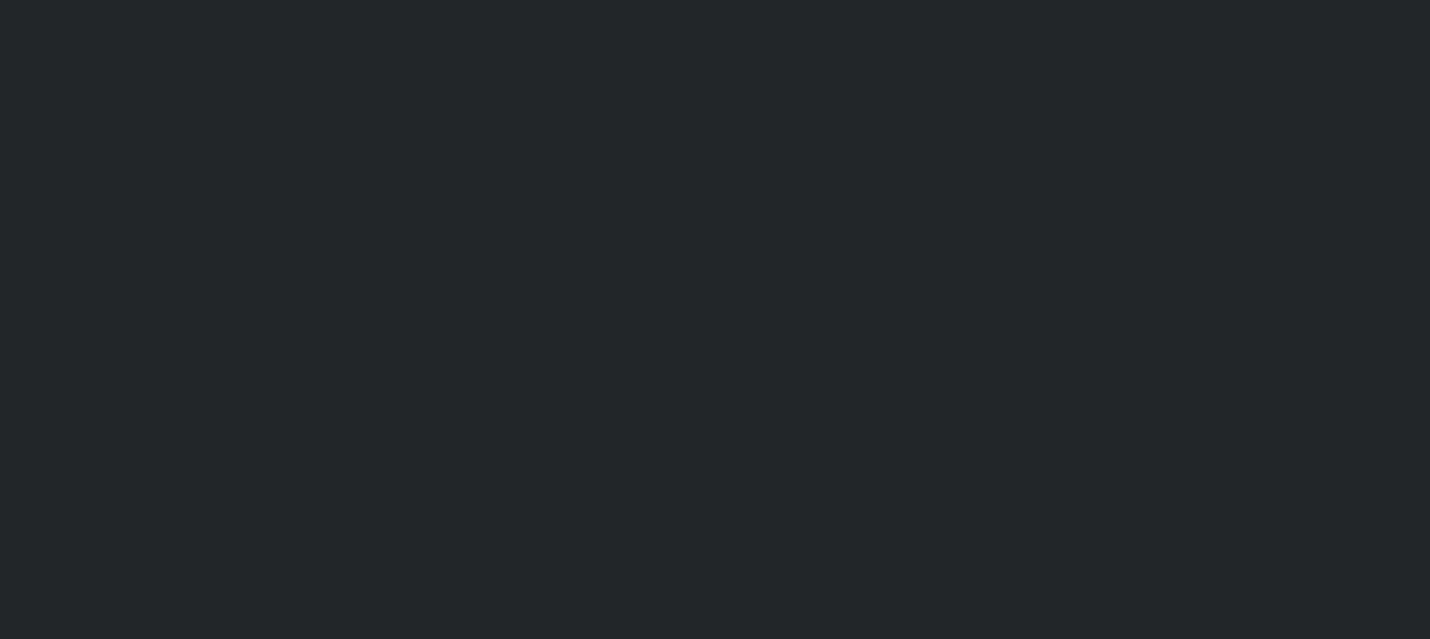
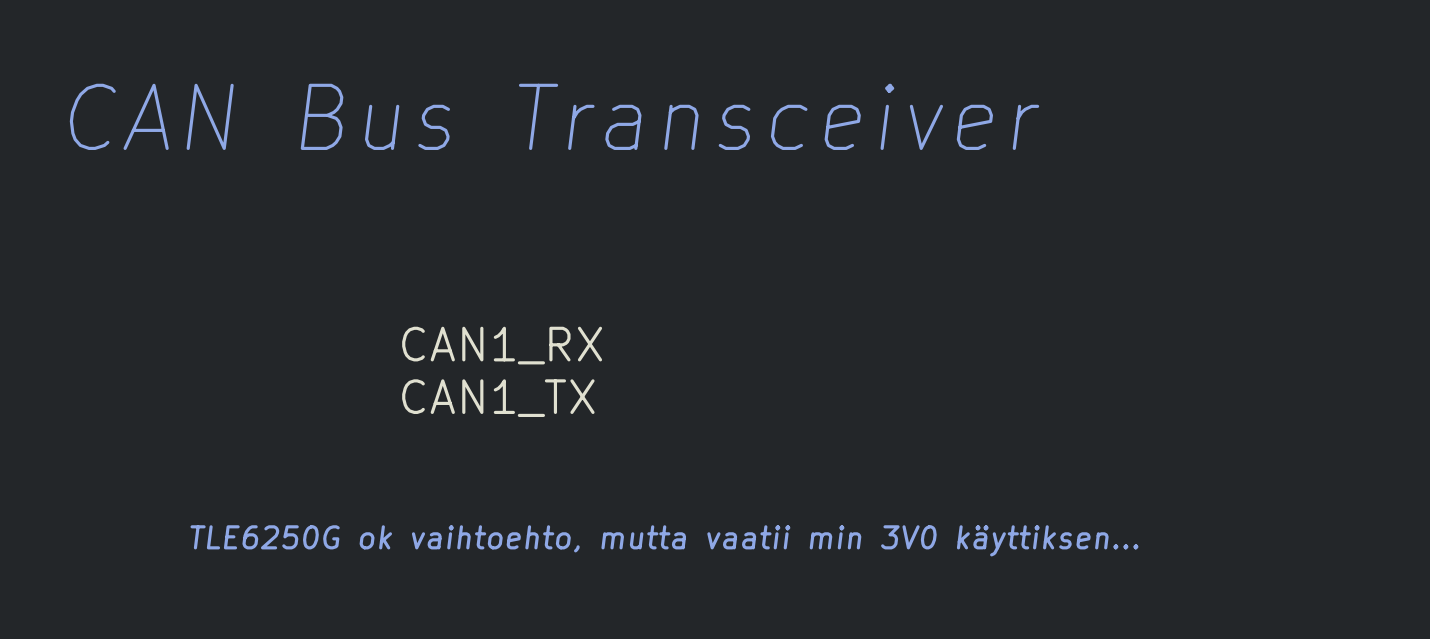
text: none -> CAN Bus Transceiver (554, 116)
label: none -> CAN1_RX (502, 345)
label: none -> CAN1_TX (498, 398)
text: none -> TLE6250G ok vaihtoehto, mutta vaatii min 3V0 käyttiksen... (664, 540)

